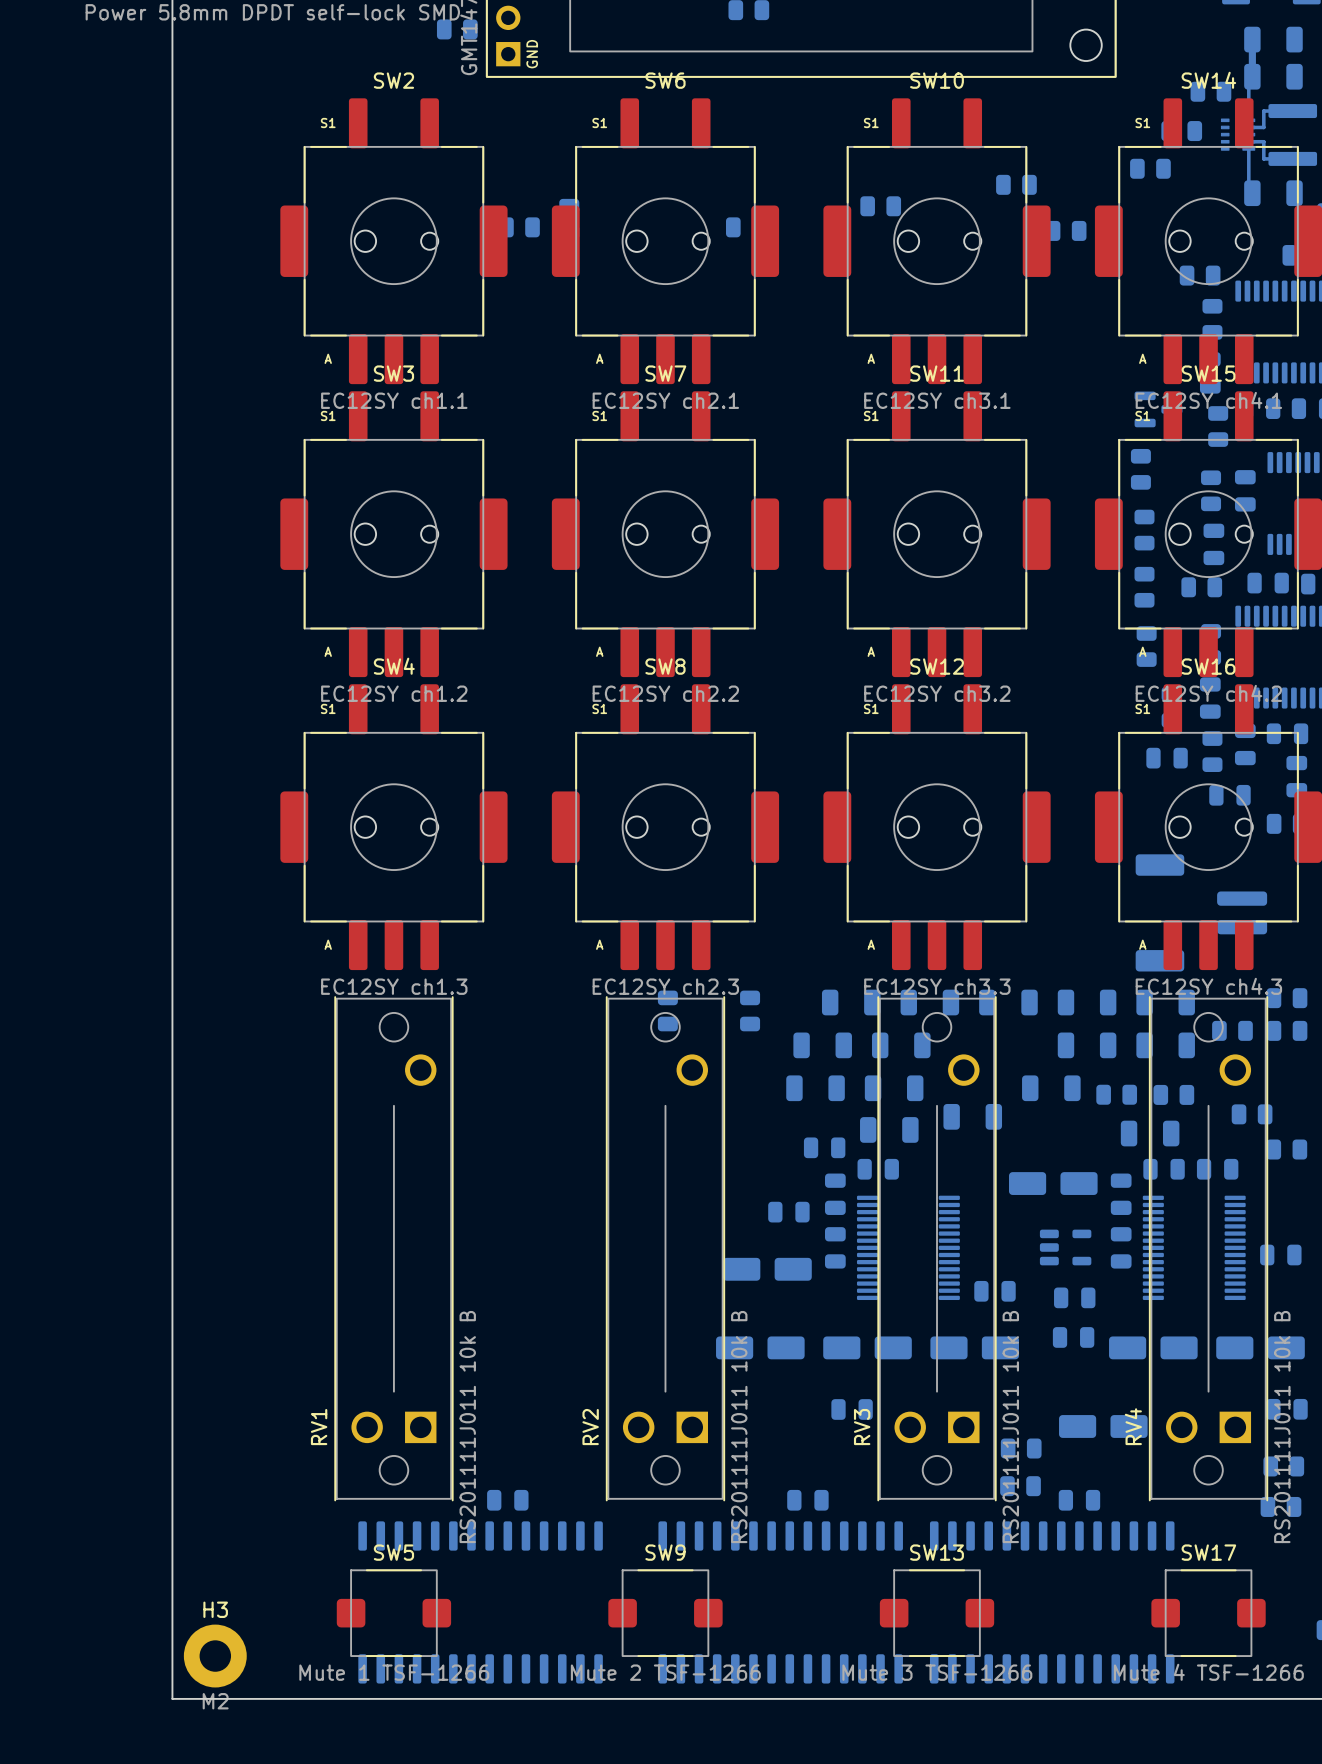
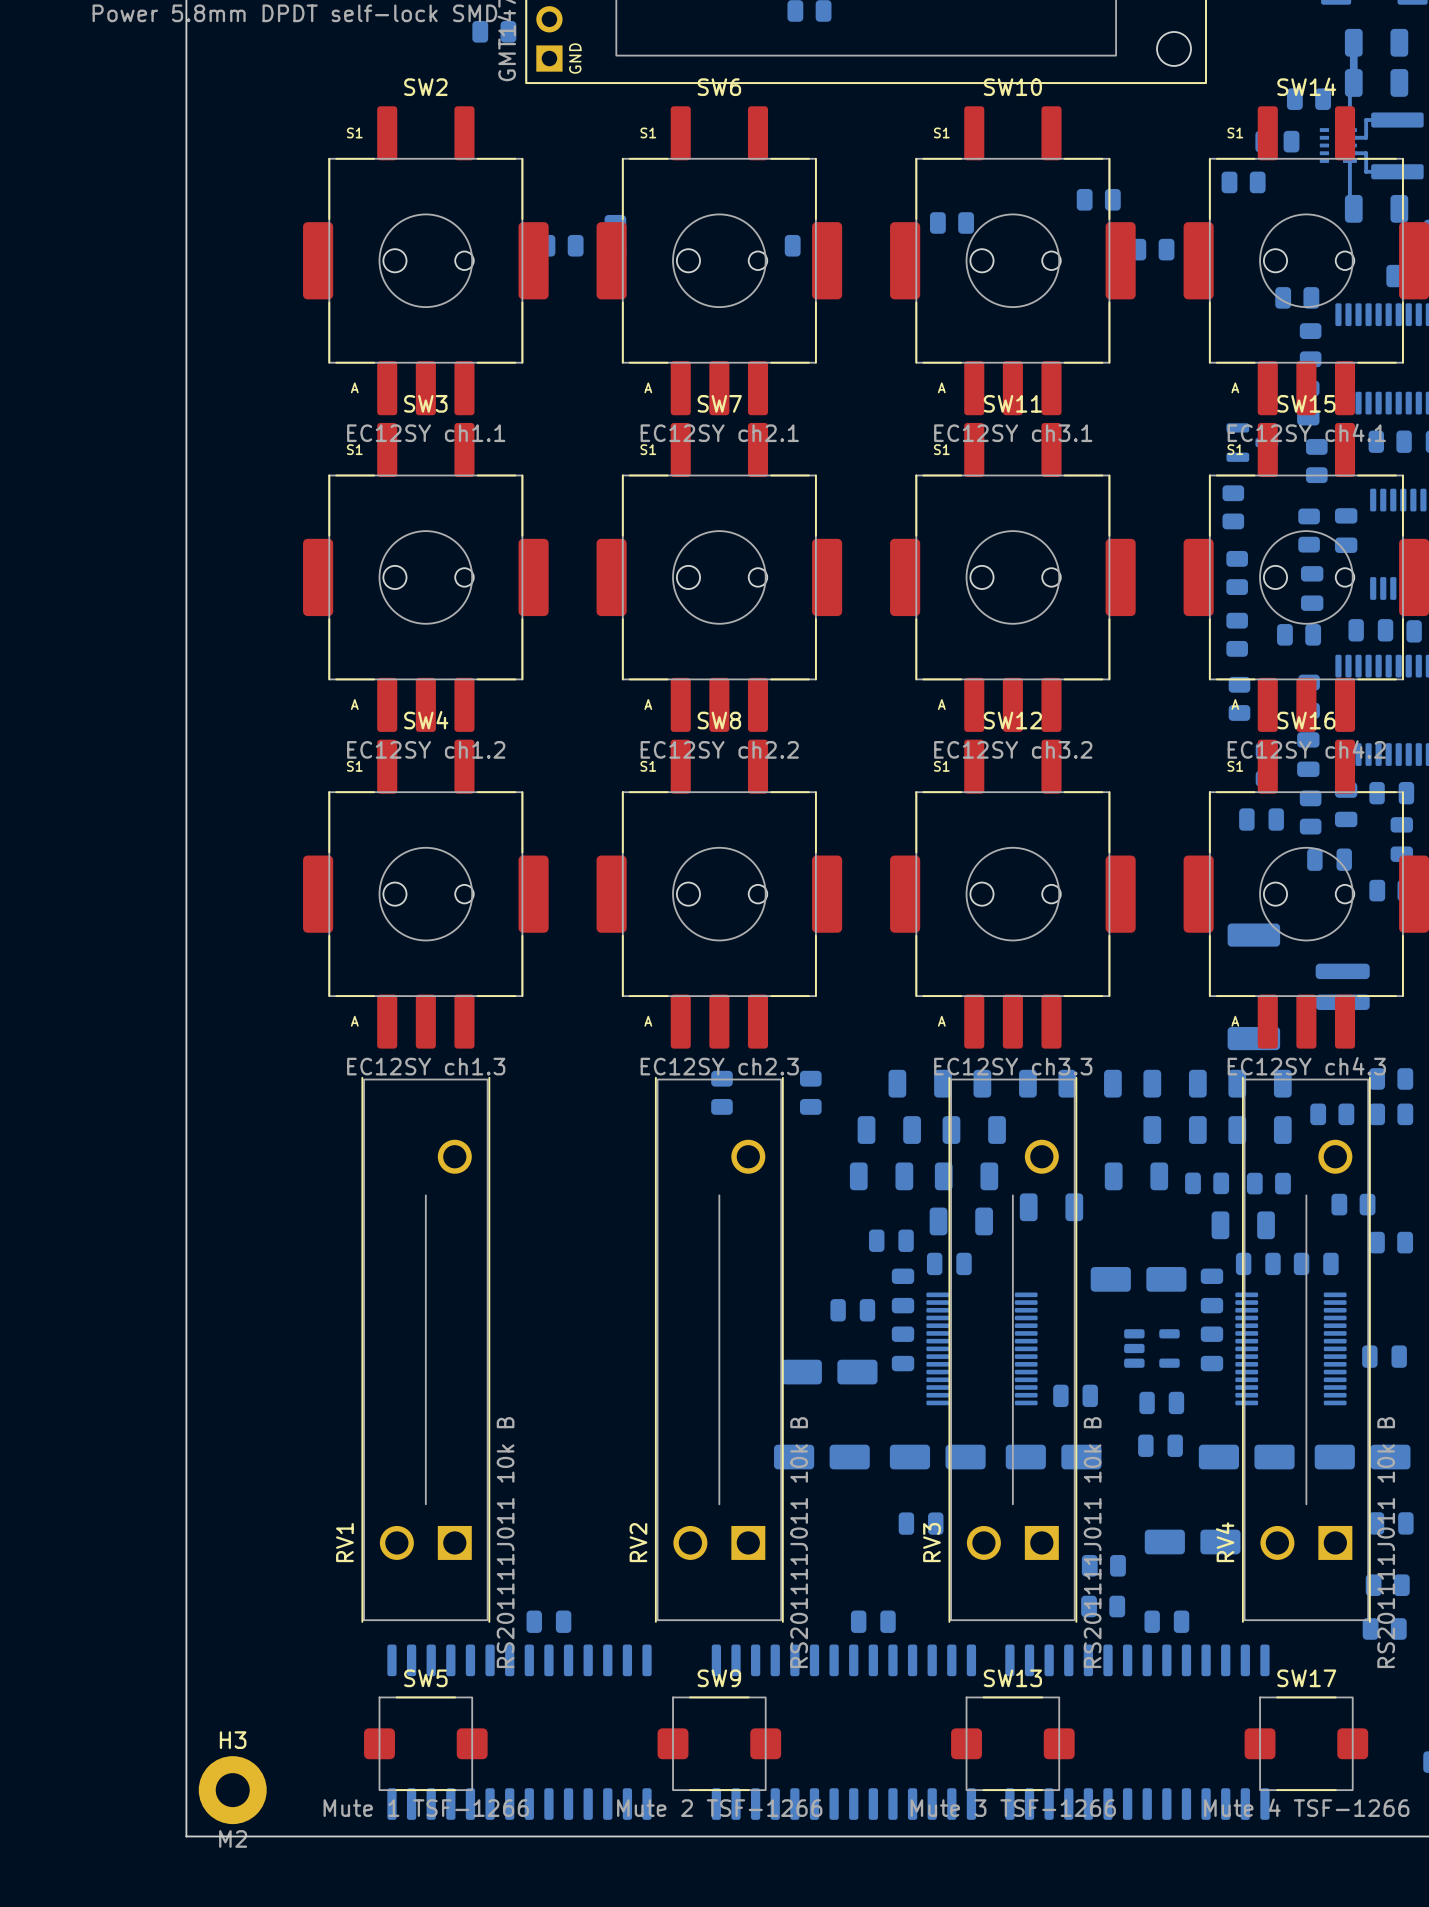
RV1 footprint: [334, 996, 454, 1502] -> [361, 1076, 491, 1623]
RV2 footprint: [605, 996, 726, 1502] -> [654, 1076, 784, 1623]
RV3 footprint: [877, 996, 997, 1502] -> [948, 1076, 1078, 1623]
RV4 footprint: [1148, 996, 1269, 1502] -> [1241, 1076, 1371, 1623]

